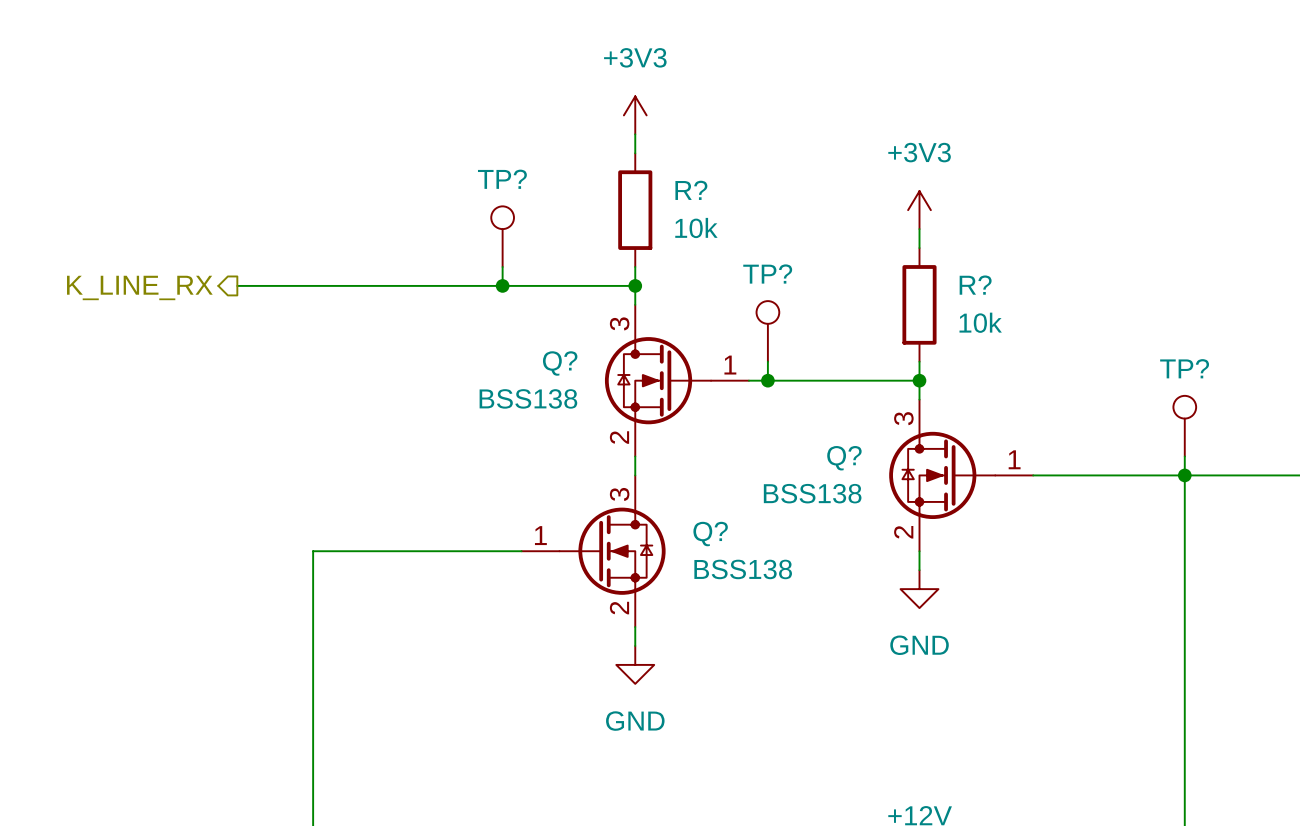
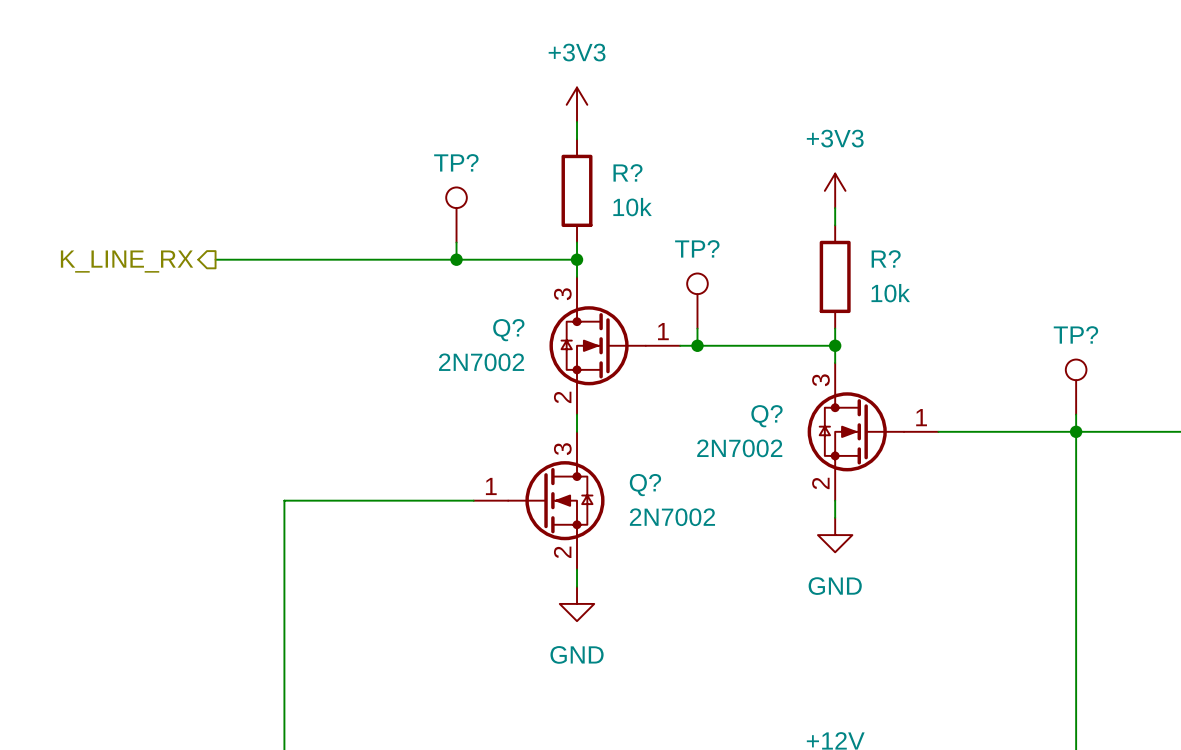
Q? value: BSS138 (528, 398) -> 2N7002 (481, 362)
Q? value: BSS138 (812, 493) -> 2N7002 (739, 448)
Q? value: BSS138 (743, 569) -> 2N7002 (672, 517)

